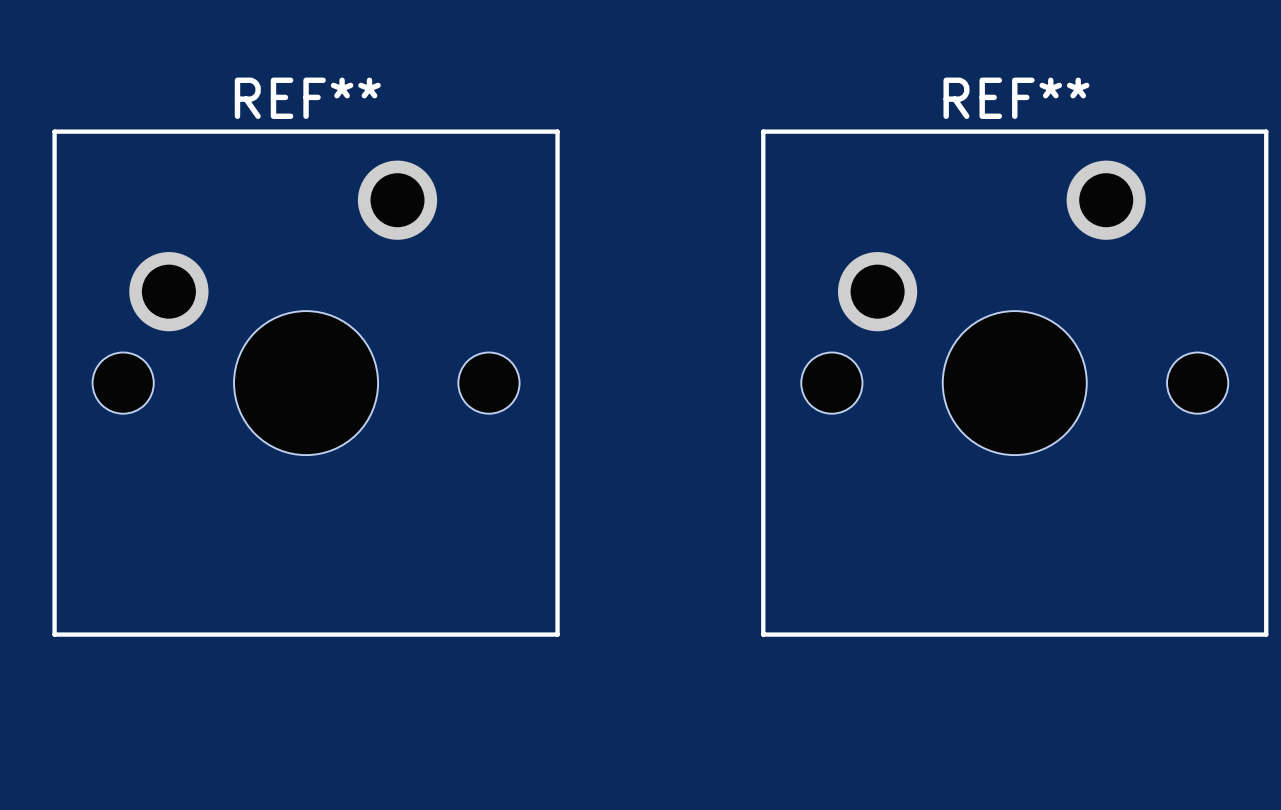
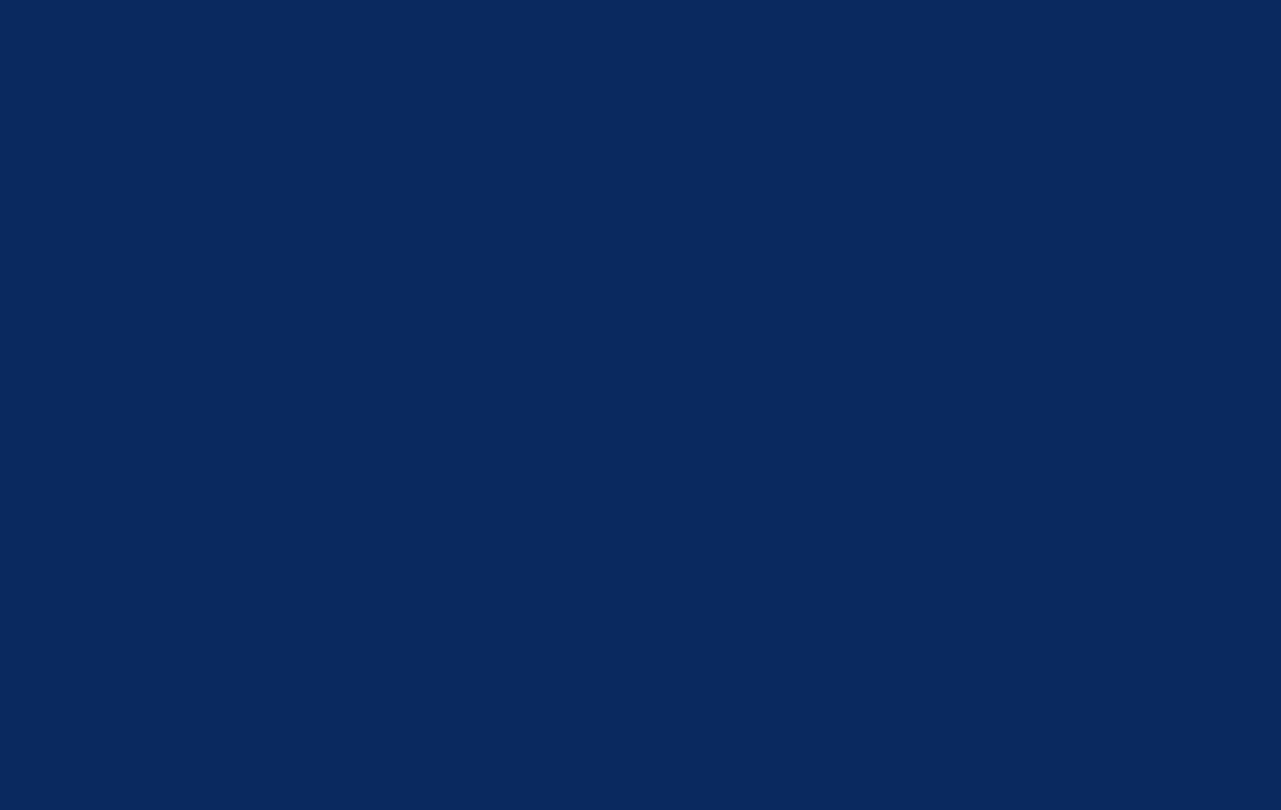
REF**: (306, 383) -> none
REF**: (1014, 383) -> none

